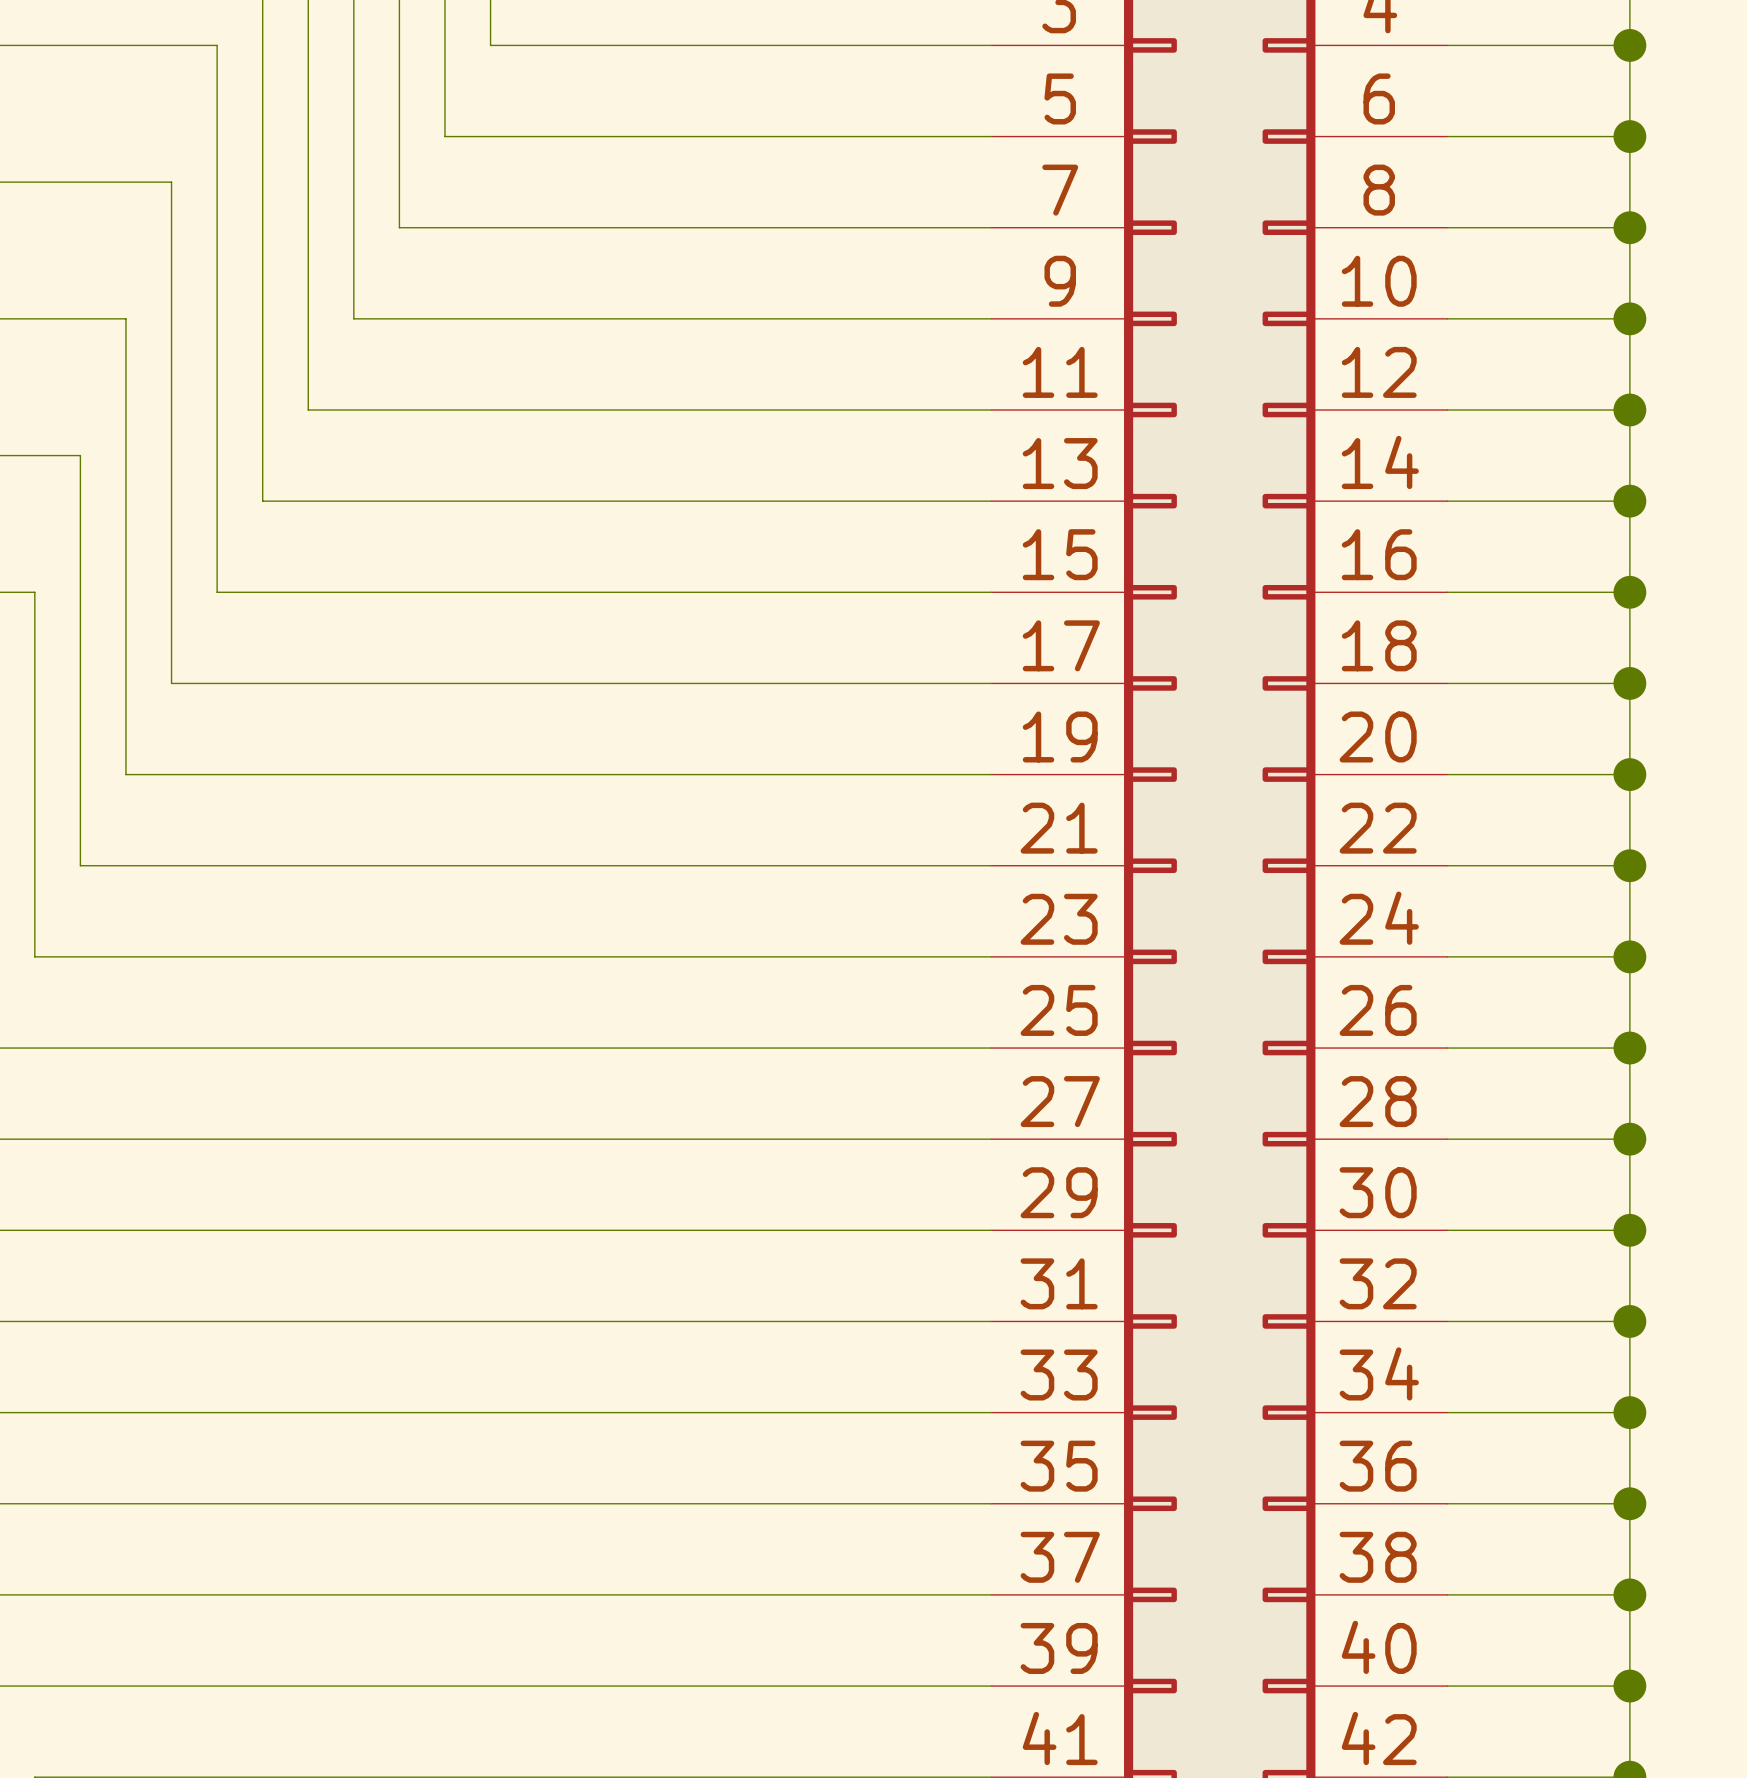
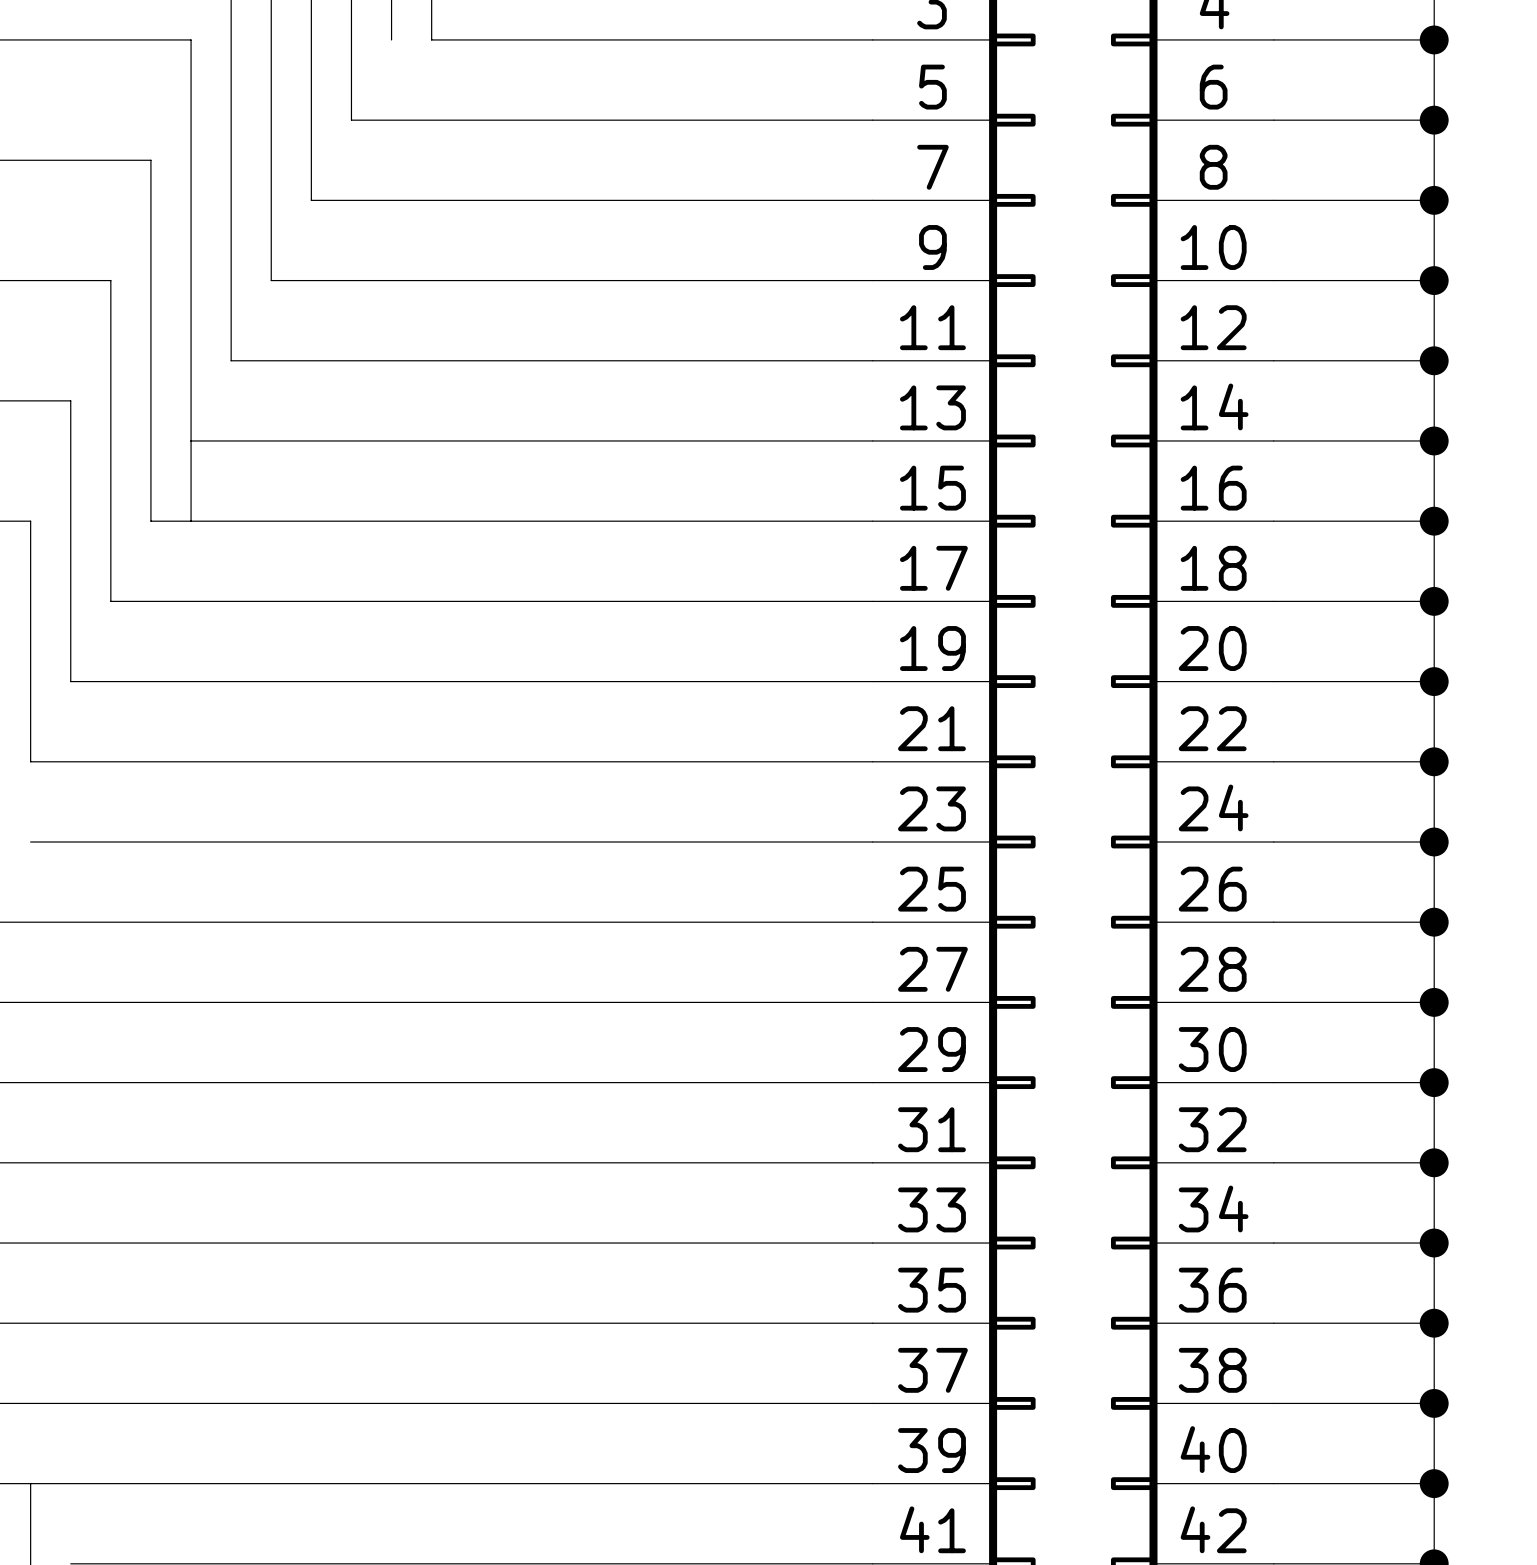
wire: (444, 45) (444, 136) -> (351, 120) (391, 120)
wire: (399, 136) (399, 227) -> (311, 200) (351, 200)
wire: (353, 227) (353, 318) -> (271, 280) (311, 280)
wire: (308, 318) (308, 410) -> (231, 360) (271, 360)
wire: (262, 410) (262, 501) -> (191, 440) (231, 440)
wire: (171, 592) (171, 683) -> (150, 521) (191, 521)
wire: (125, 683) (125, 774) -> (110, 601) (150, 601)
wire: (80, 774) (80, 865) -> (70, 681) (110, 681)
wire: (34, 865) (34, 956) -> (30, 761) (70, 761)
wire: (34, 1777) (80, 1777) -> (30, 1563) (30, 1483)

